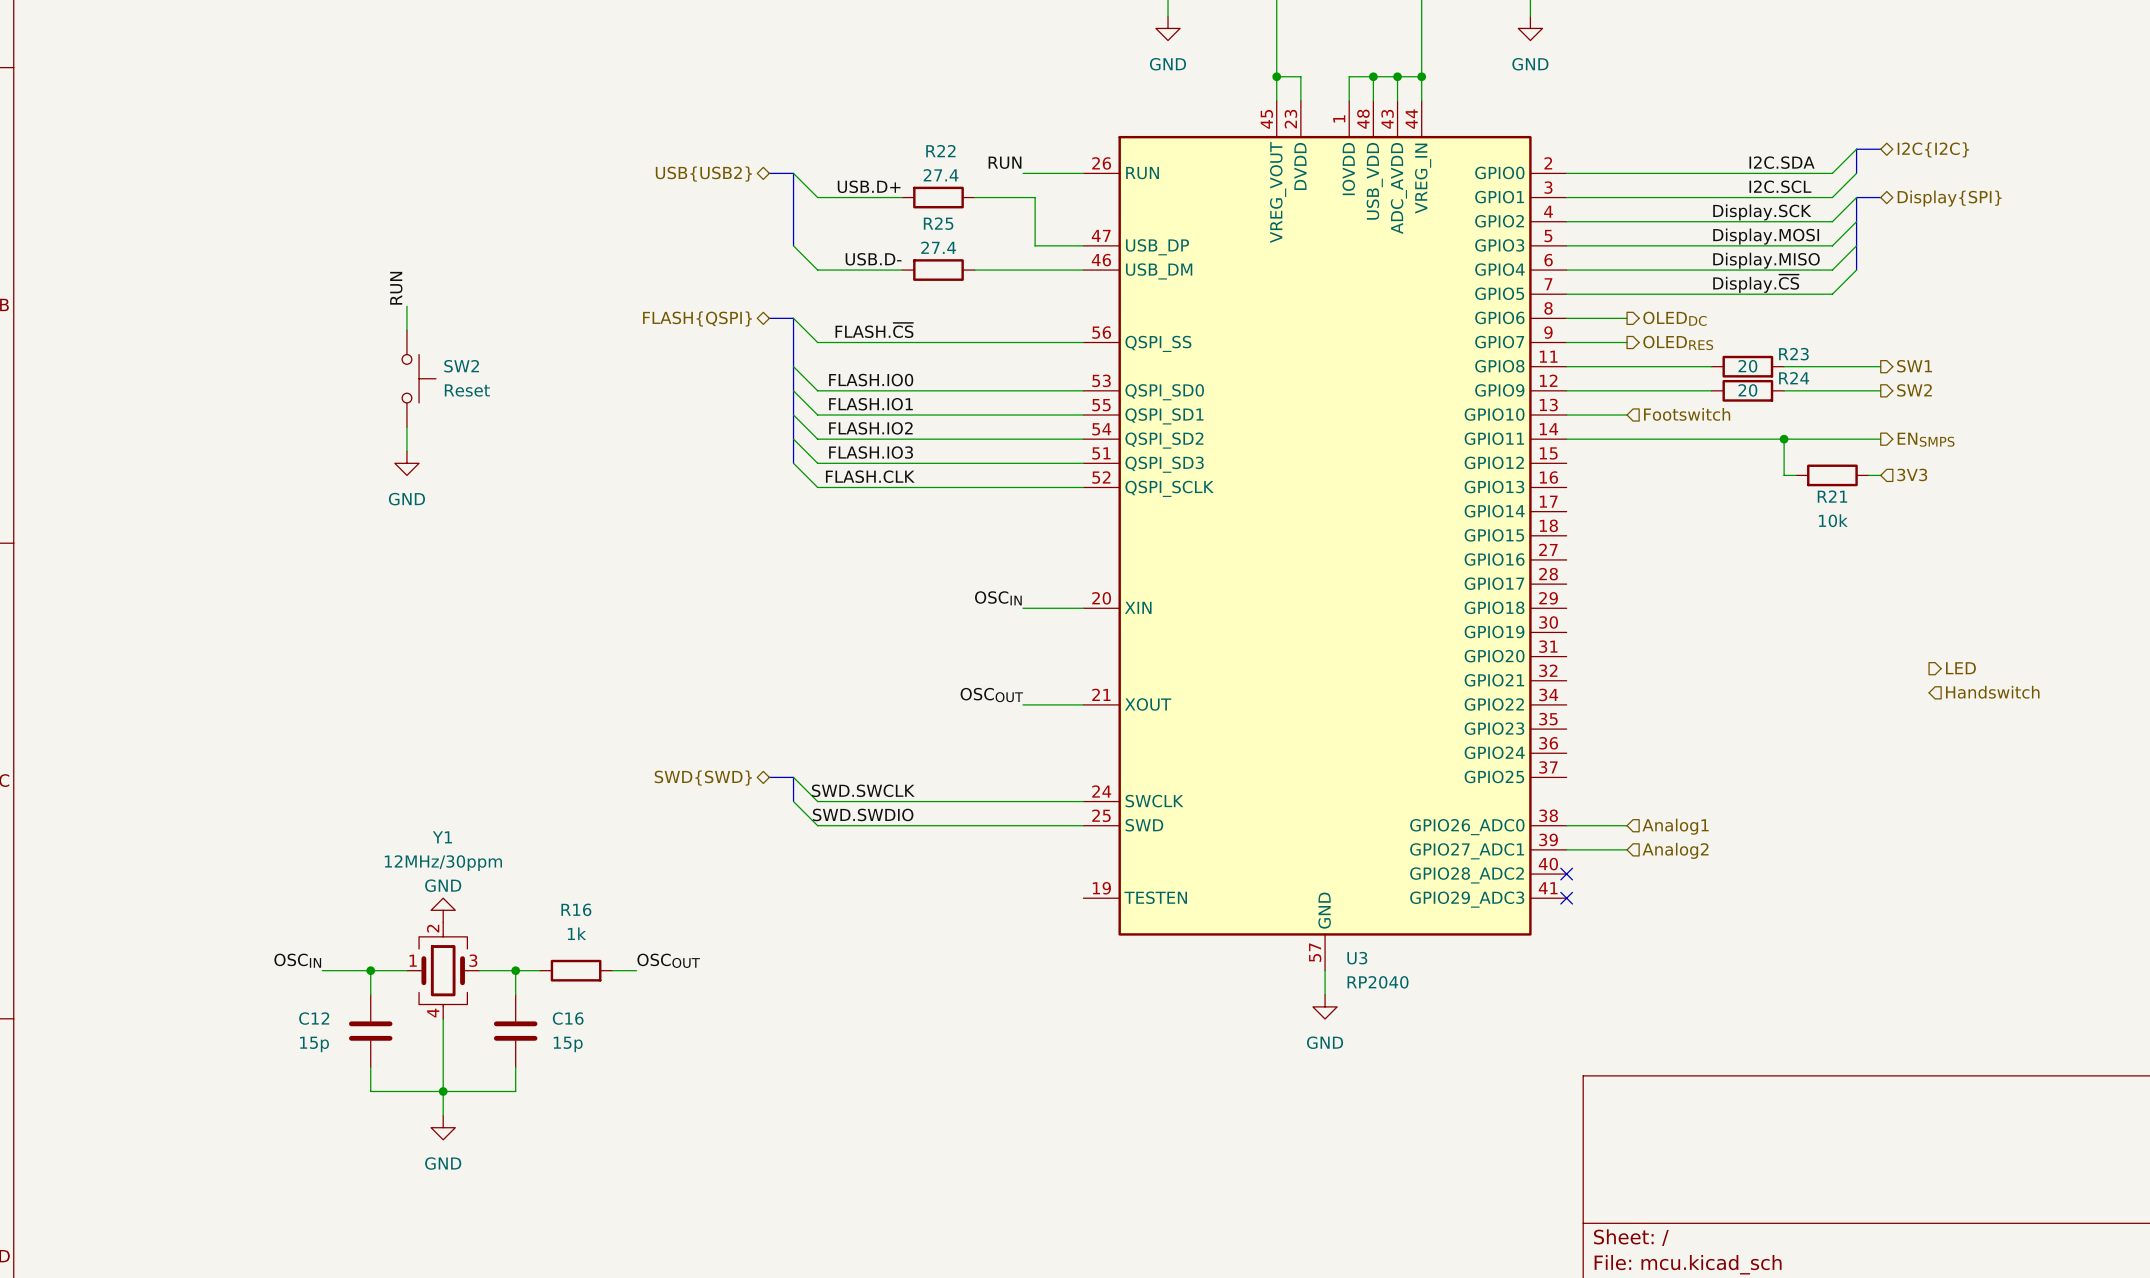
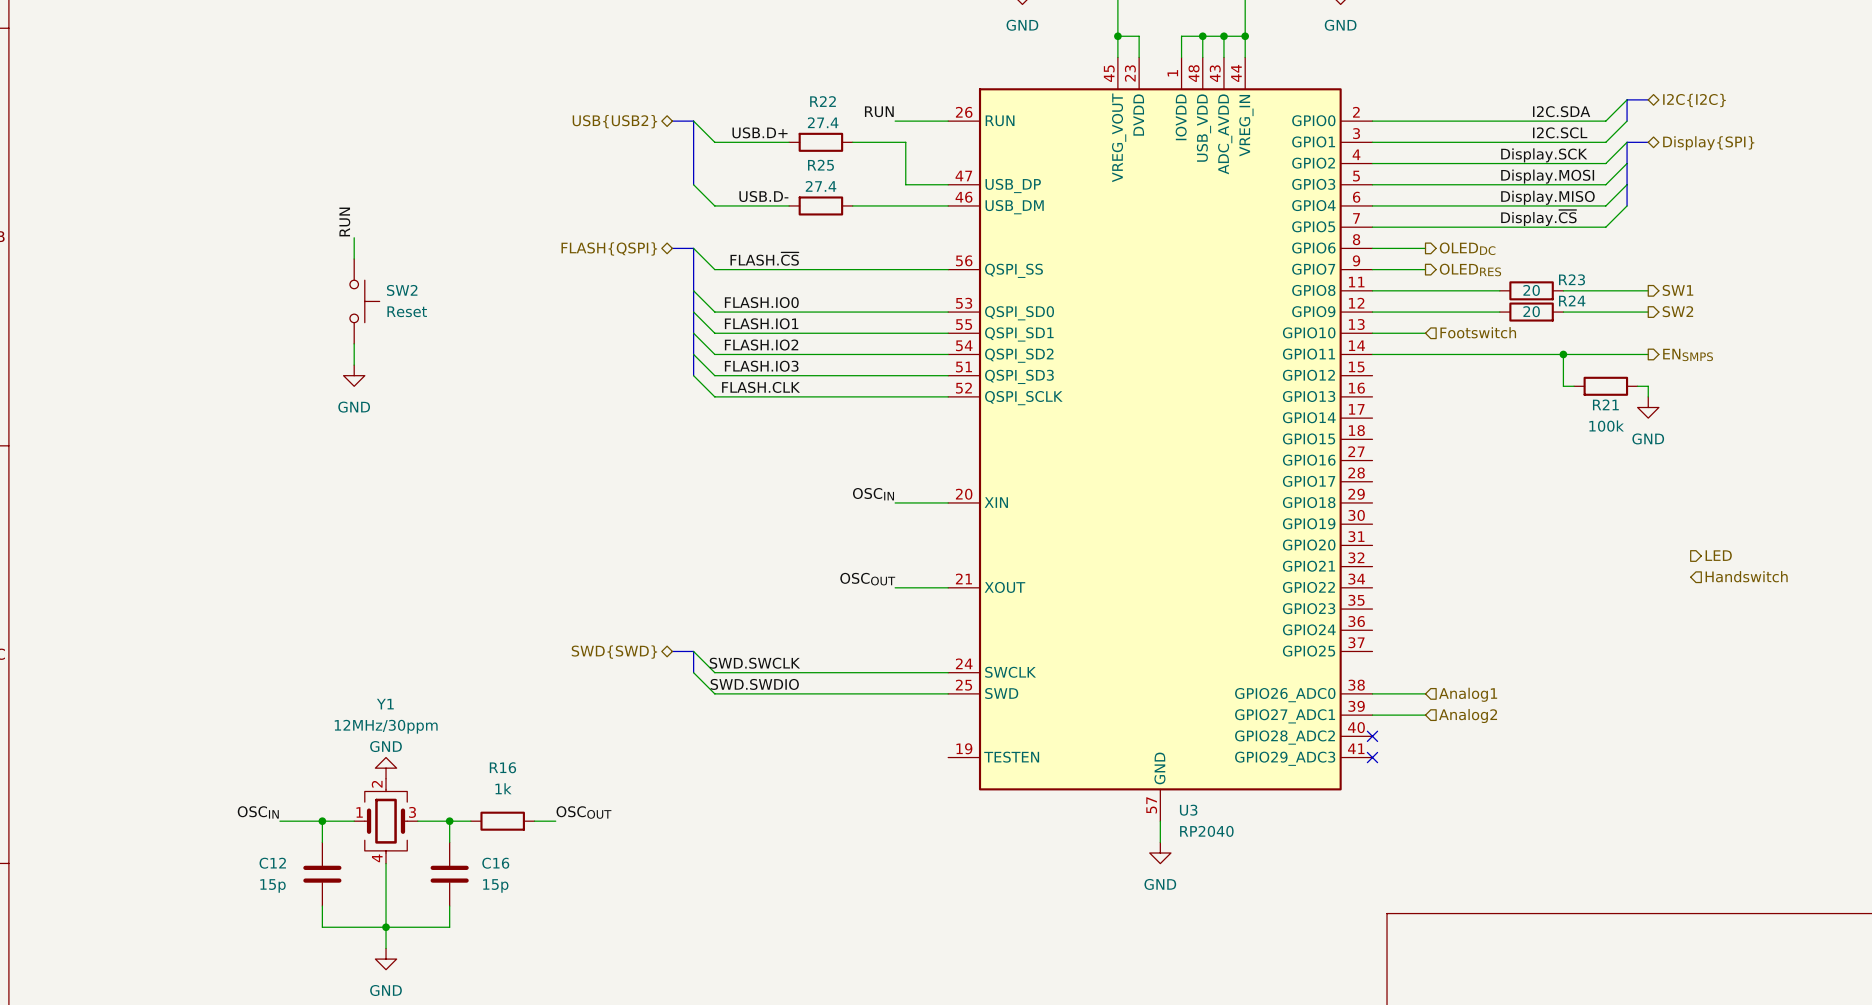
hierarchical label: 3V3 (1912, 474) -> none
wire: none -> (1648, 386) (1648, 396)
power symbol: none -> GND (1648, 407)
R21 value: 10k (1833, 520) -> 100k (1606, 426)

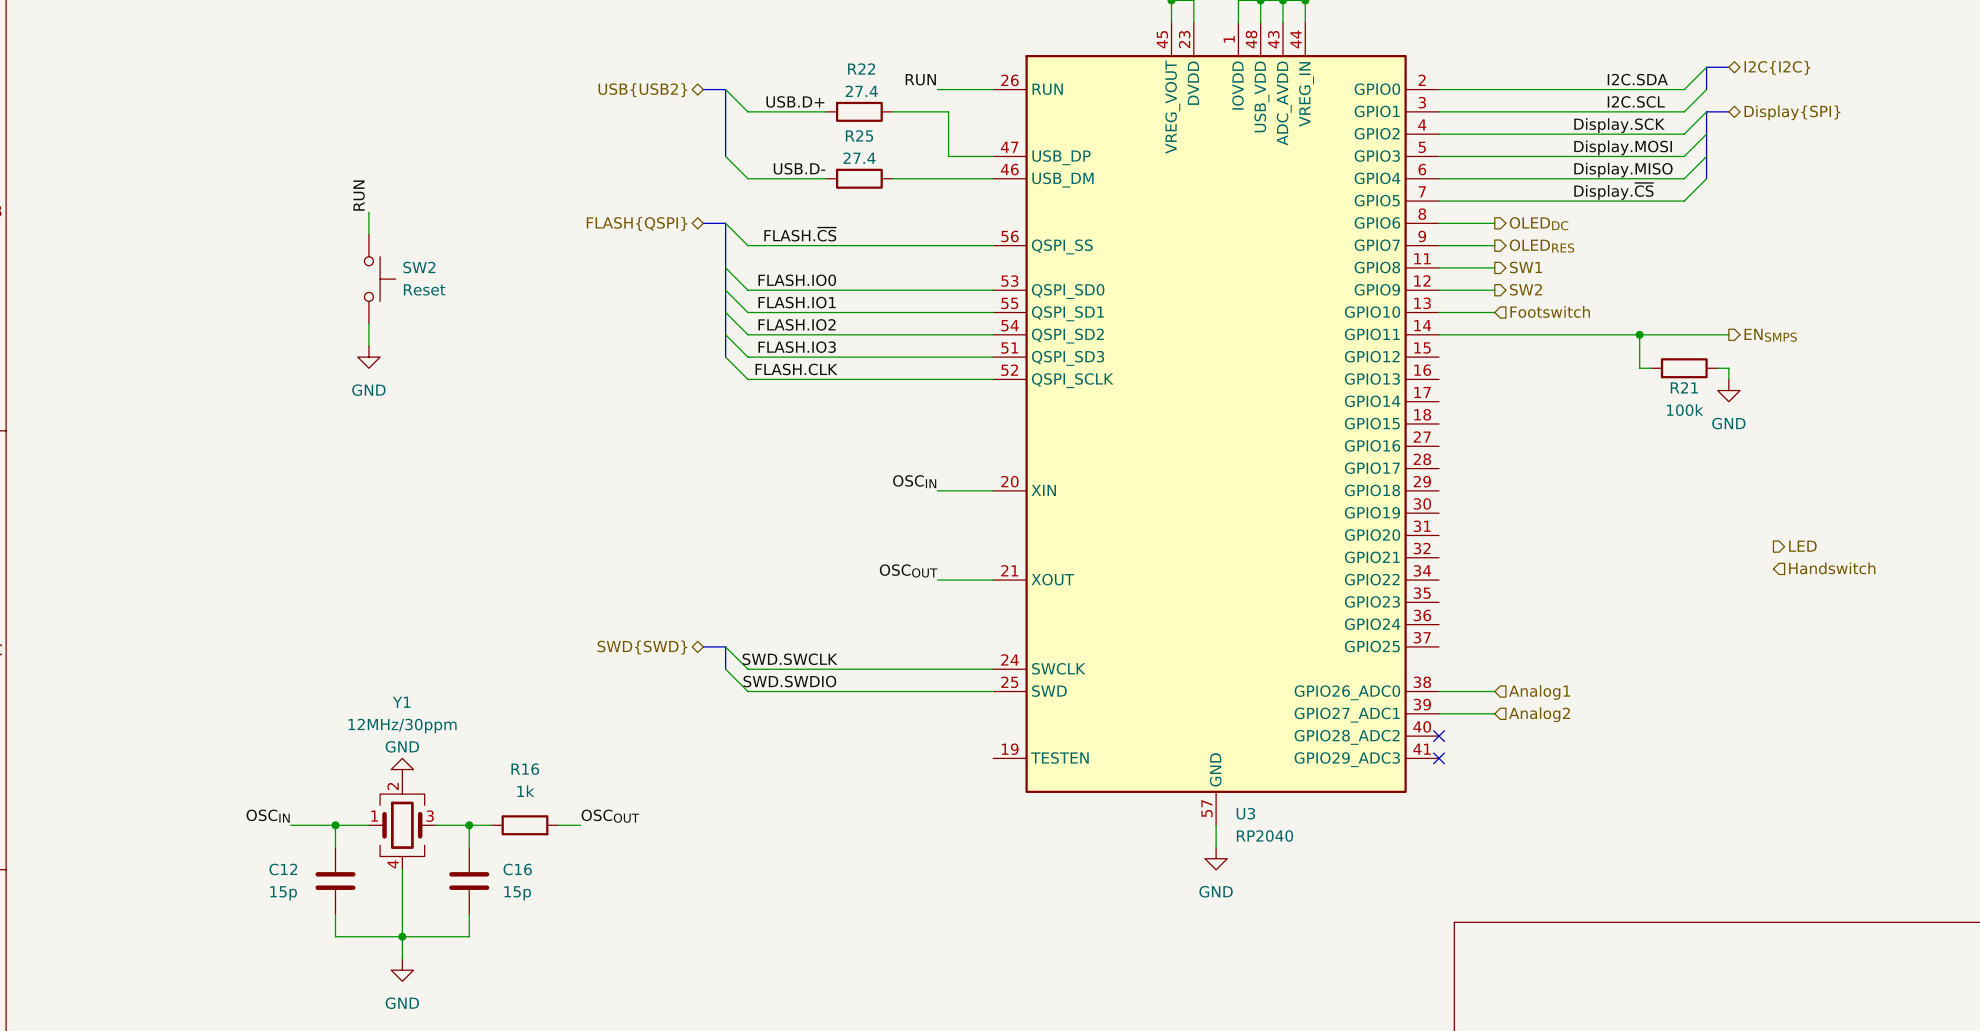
wire: (1425, 290) (1499, 290) -> none
hierarchical label: none -> SW1 (1526, 267)
R23: 20 (1531, 290) -> none
wire: (1563, 290) (1648, 290) -> none
hierarchical label: SW1 (1677, 290) -> none
hierarchical label: none -> SW2 (1525, 289)
hierarchical label: SW2 (1677, 311) -> none
wire: (1425, 312) (1499, 312) -> none
R24: 20 (1531, 312) -> none
wire: (1563, 312) (1648, 312) -> none

